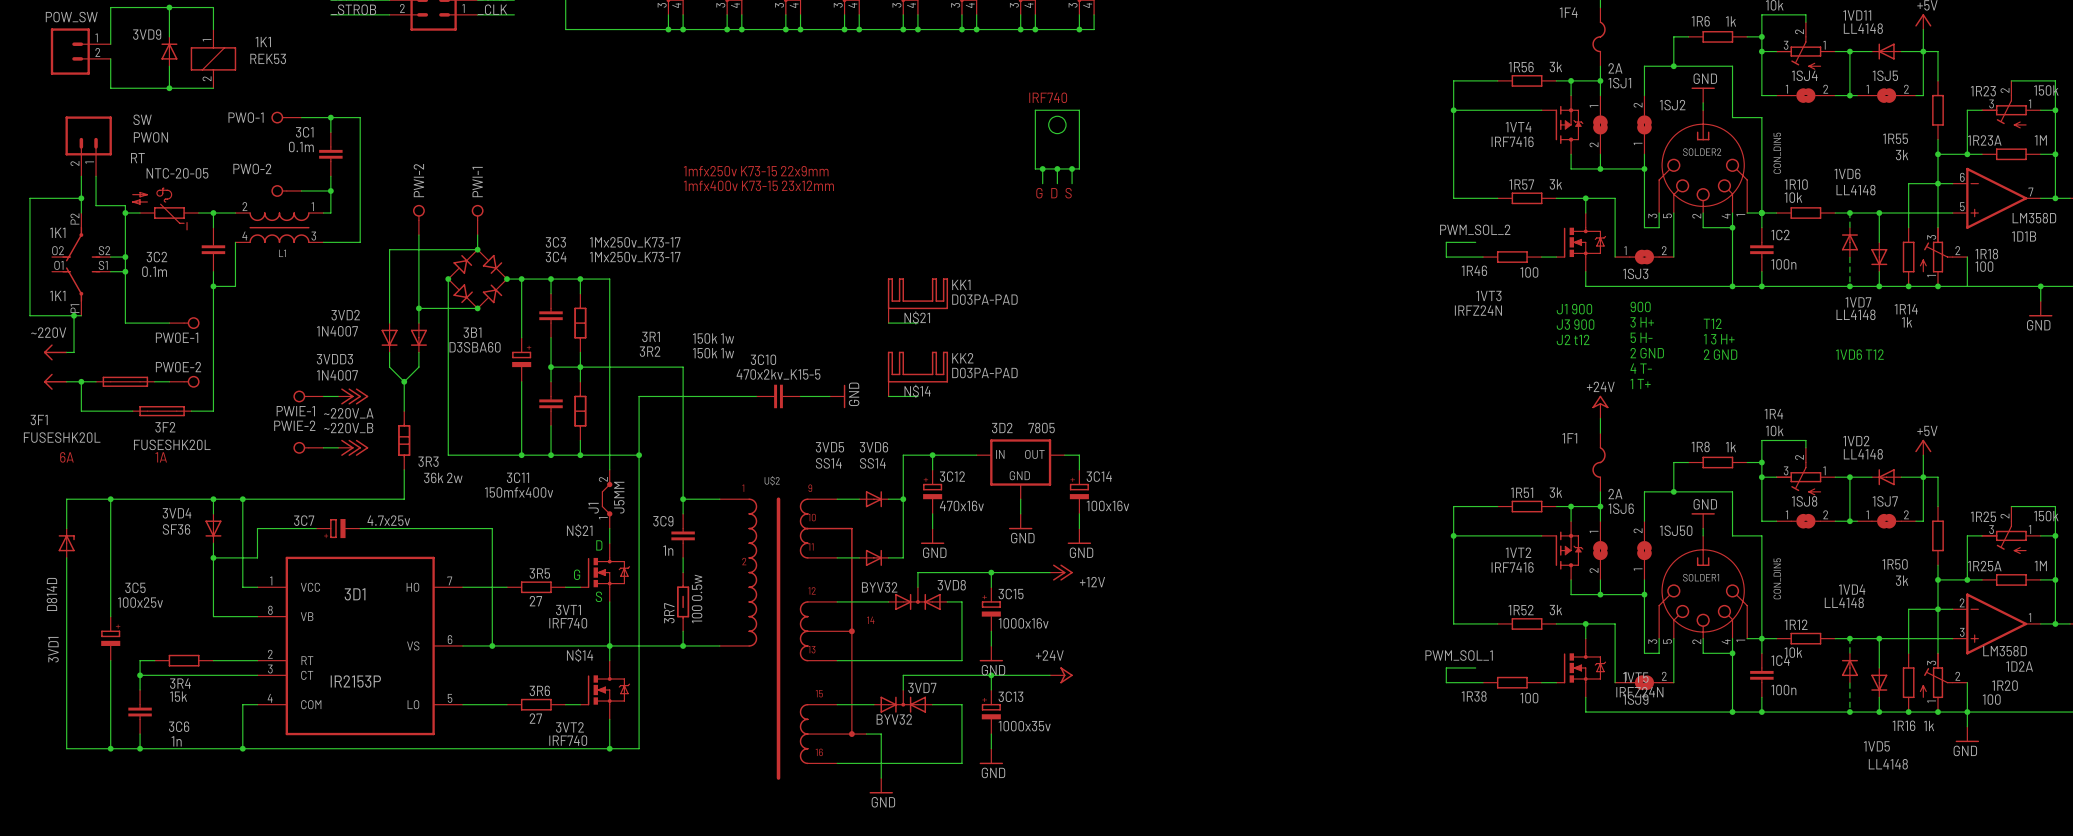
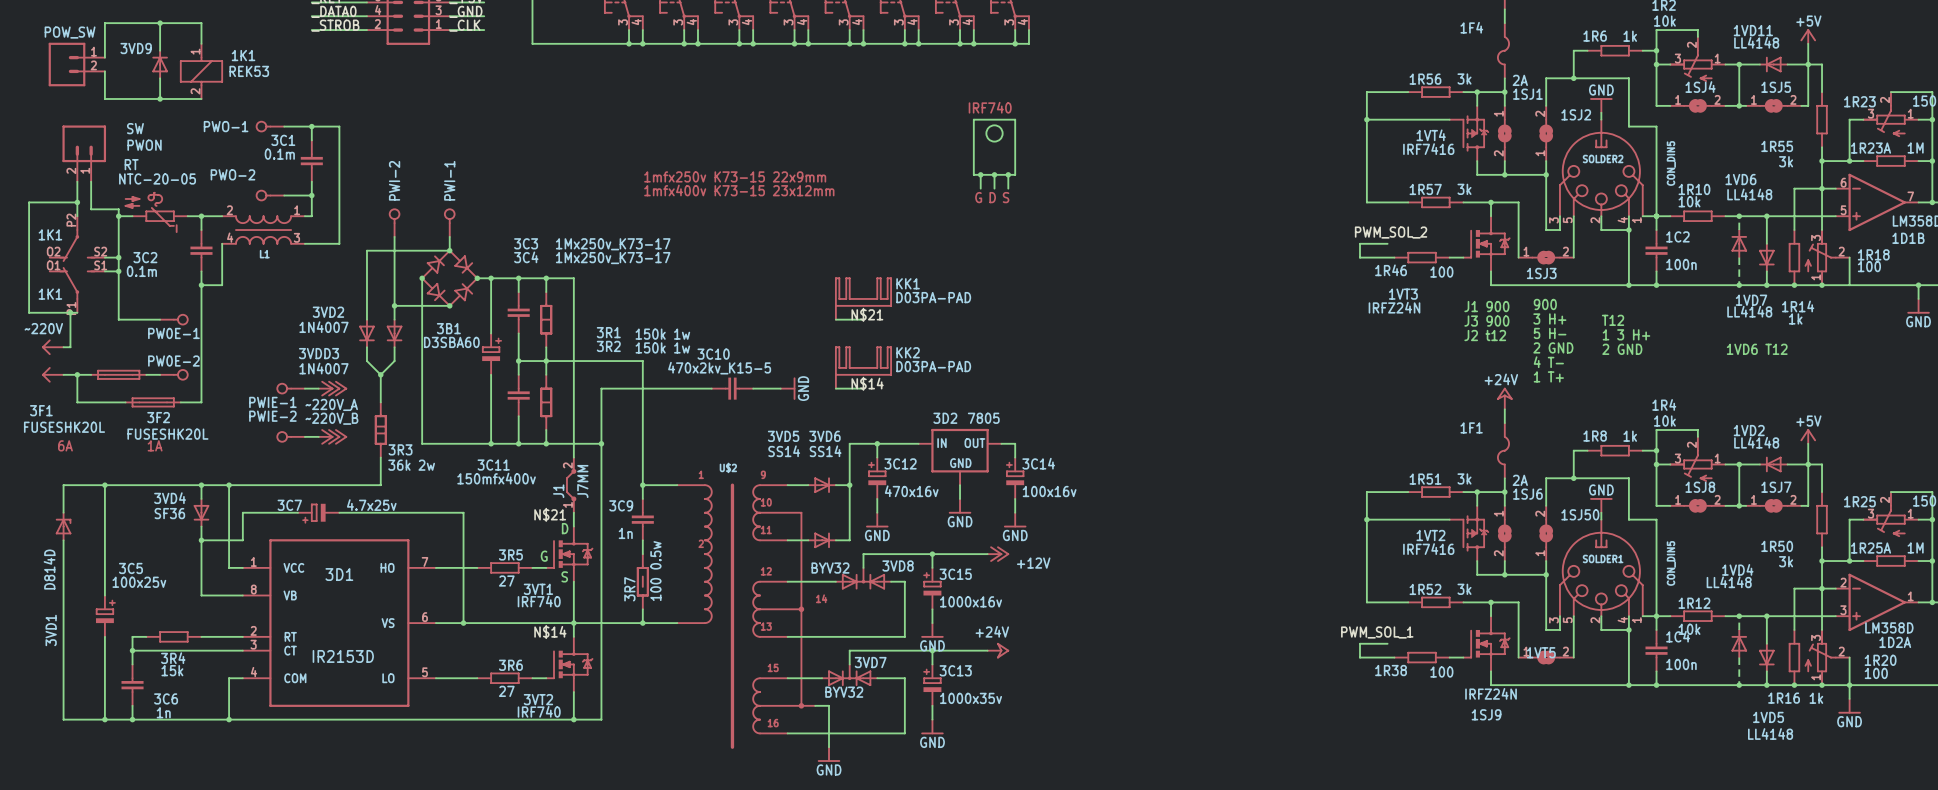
J1 value: J5MM (619, 497) -> J7MM (582, 481)
3D1 value: IR2153P (355, 681) -> IR2153D (343, 656)
1VT5 value position: IRFZ24N (1639, 692) -> IRFZ24N (1491, 693)
1SJ9 name position: 1SJ9 (1635, 699) -> 1SJ9 (1486, 714)

